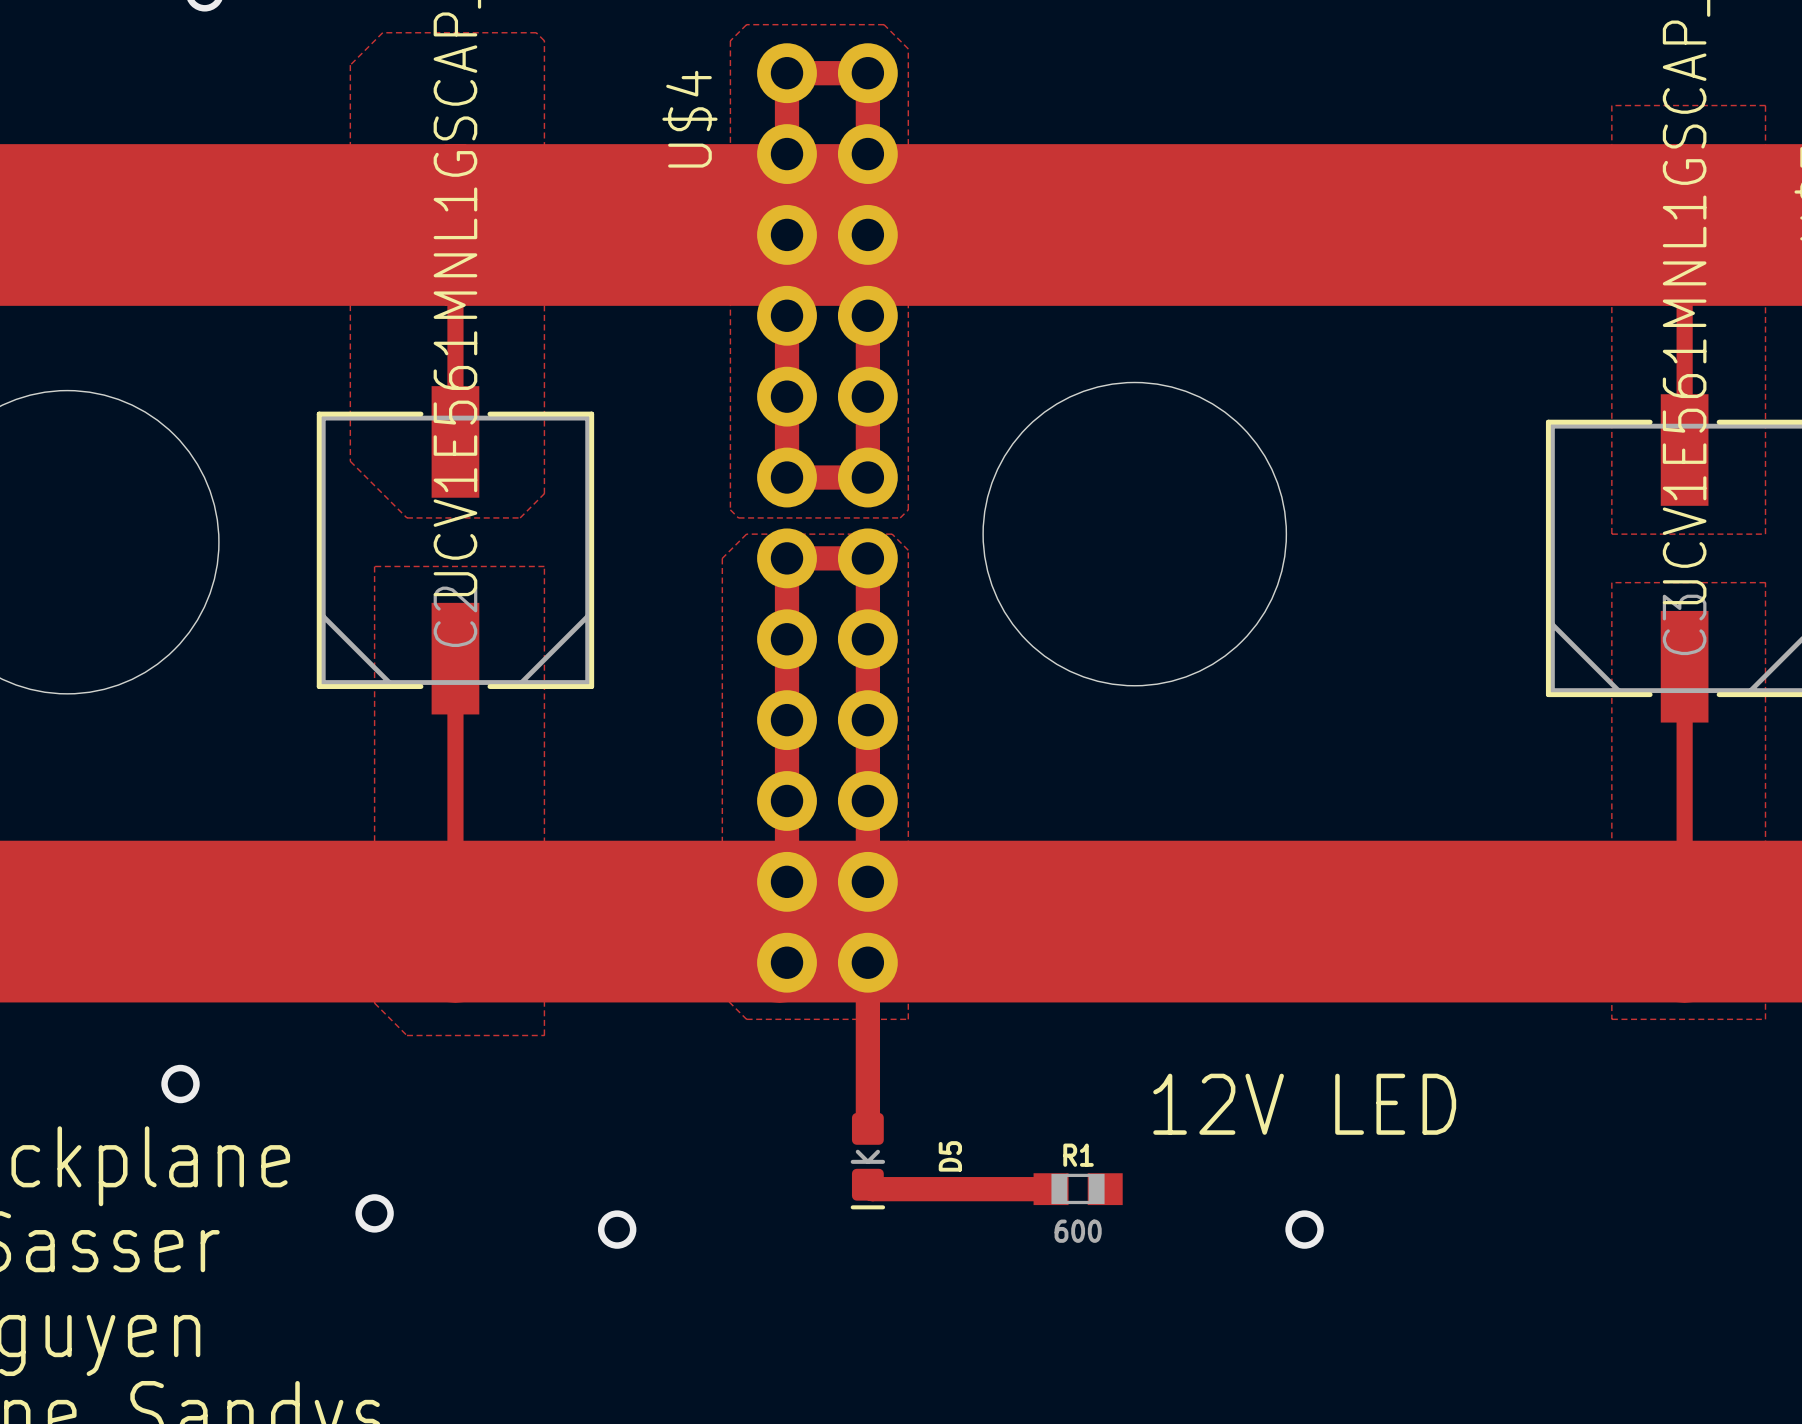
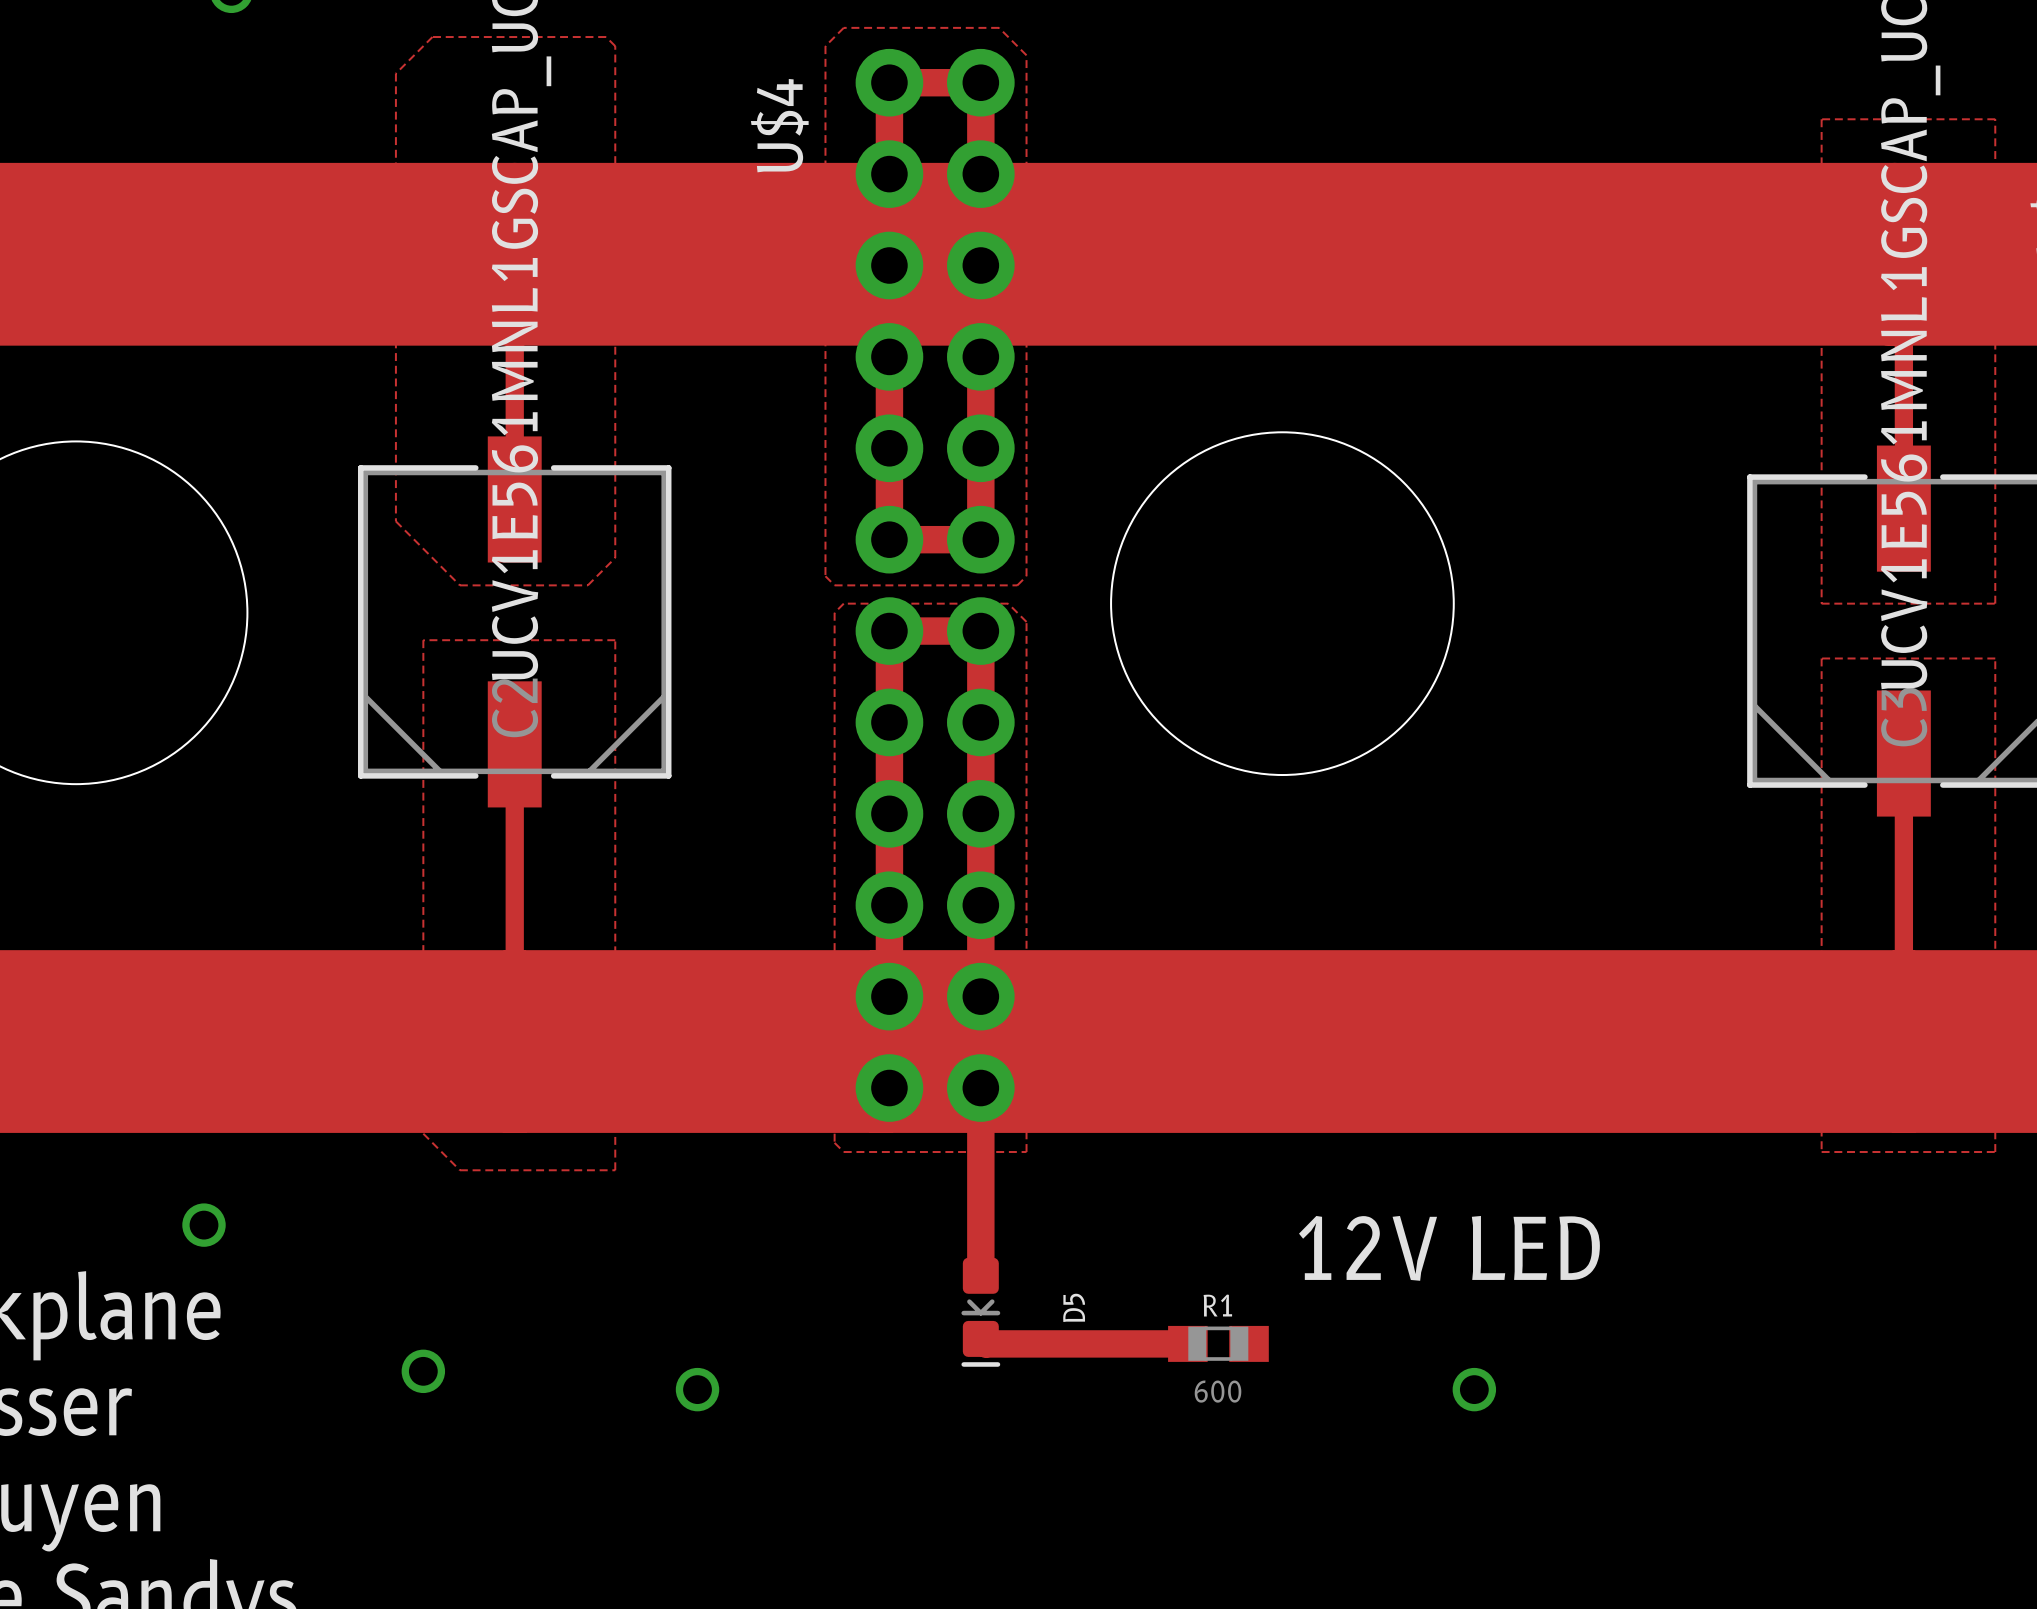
zone outline: (738, 542) (722, 558) (722, 995) (738, 1011) -> (834, 612) (834, 1142)

